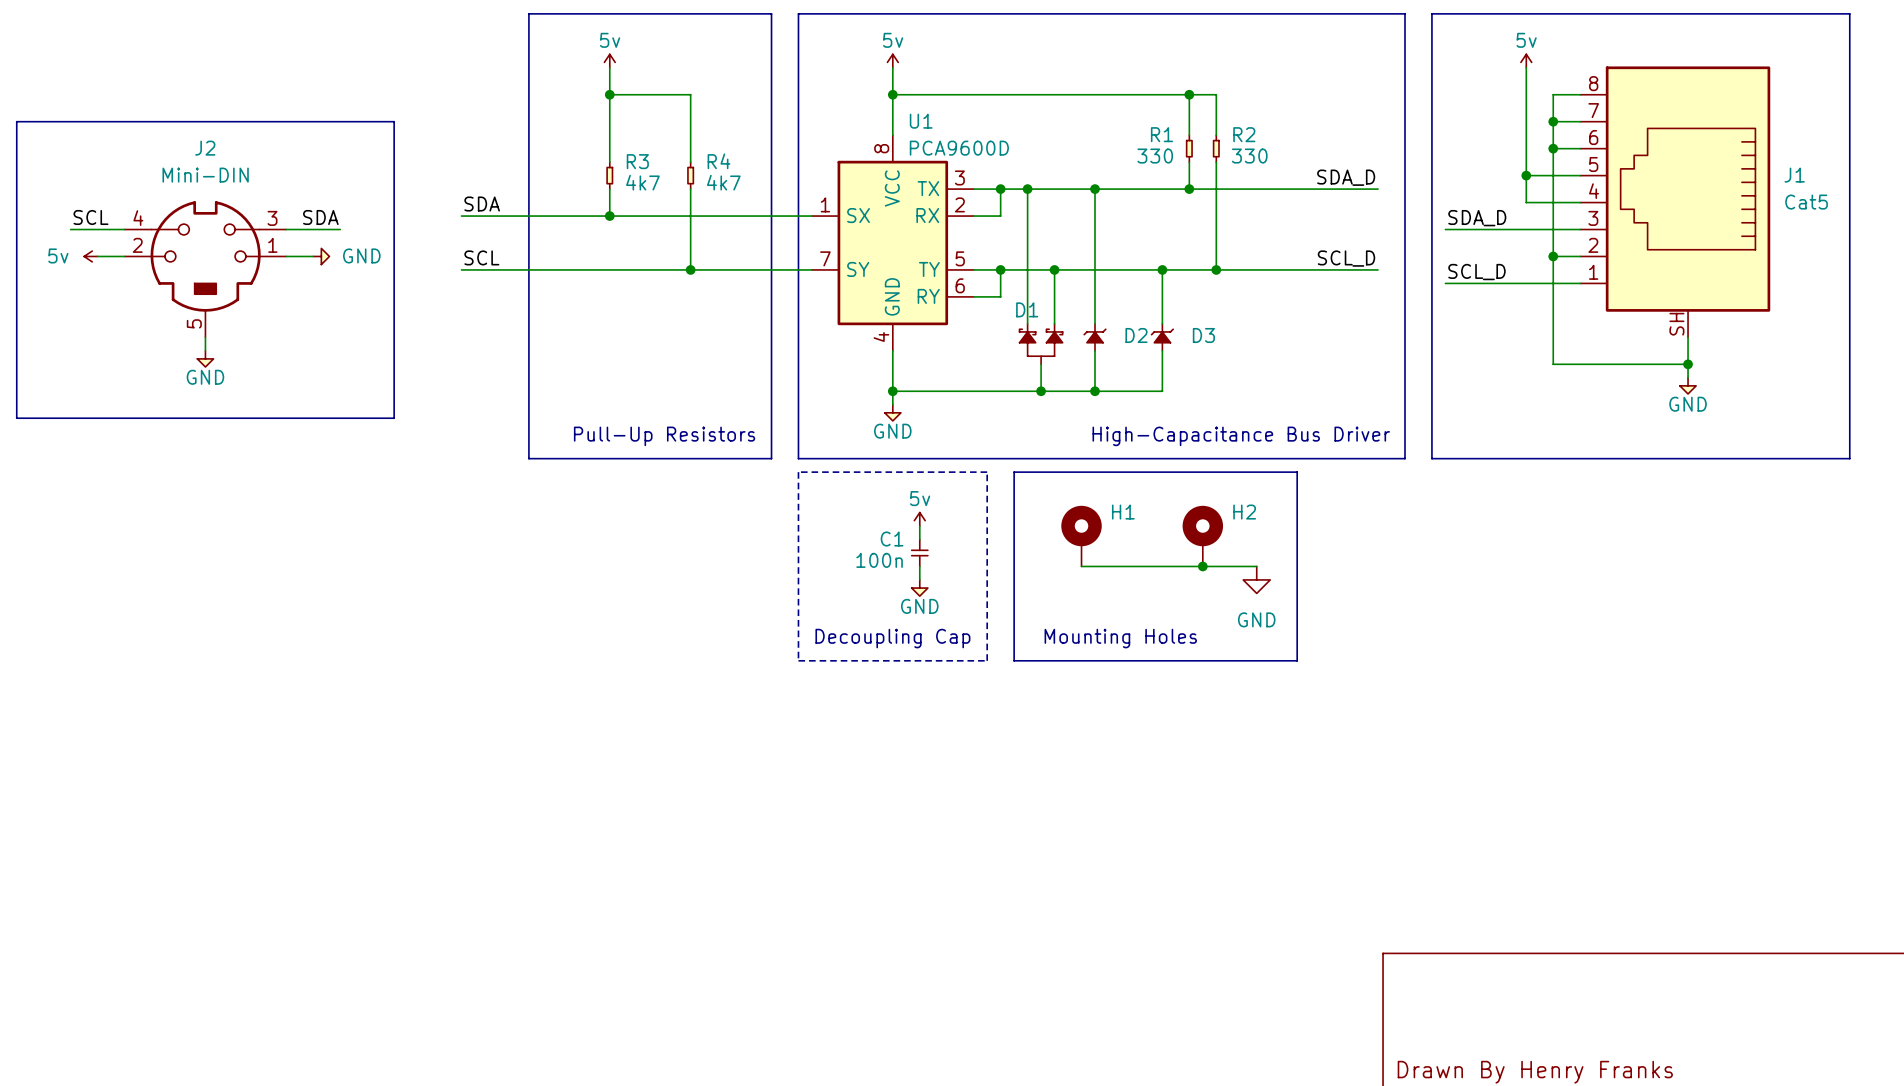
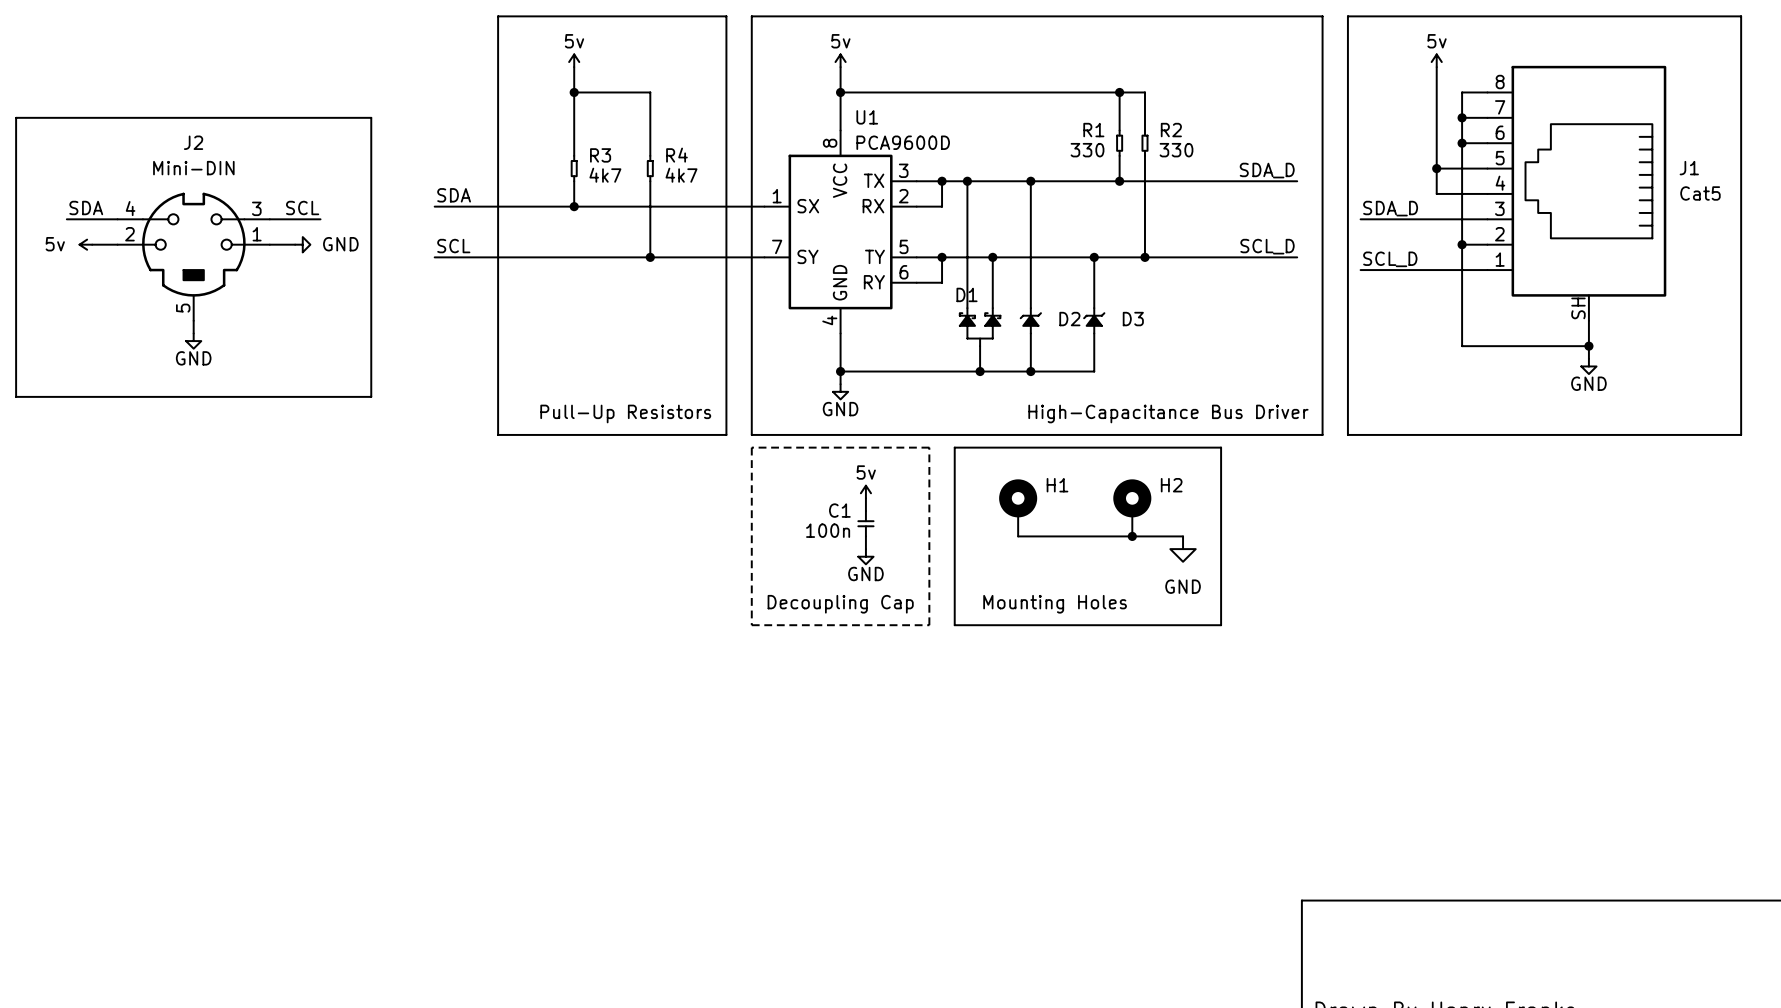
label: SCL (90, 217) -> SDA (86, 208)
label: SDA (320, 217) -> SCL (302, 208)

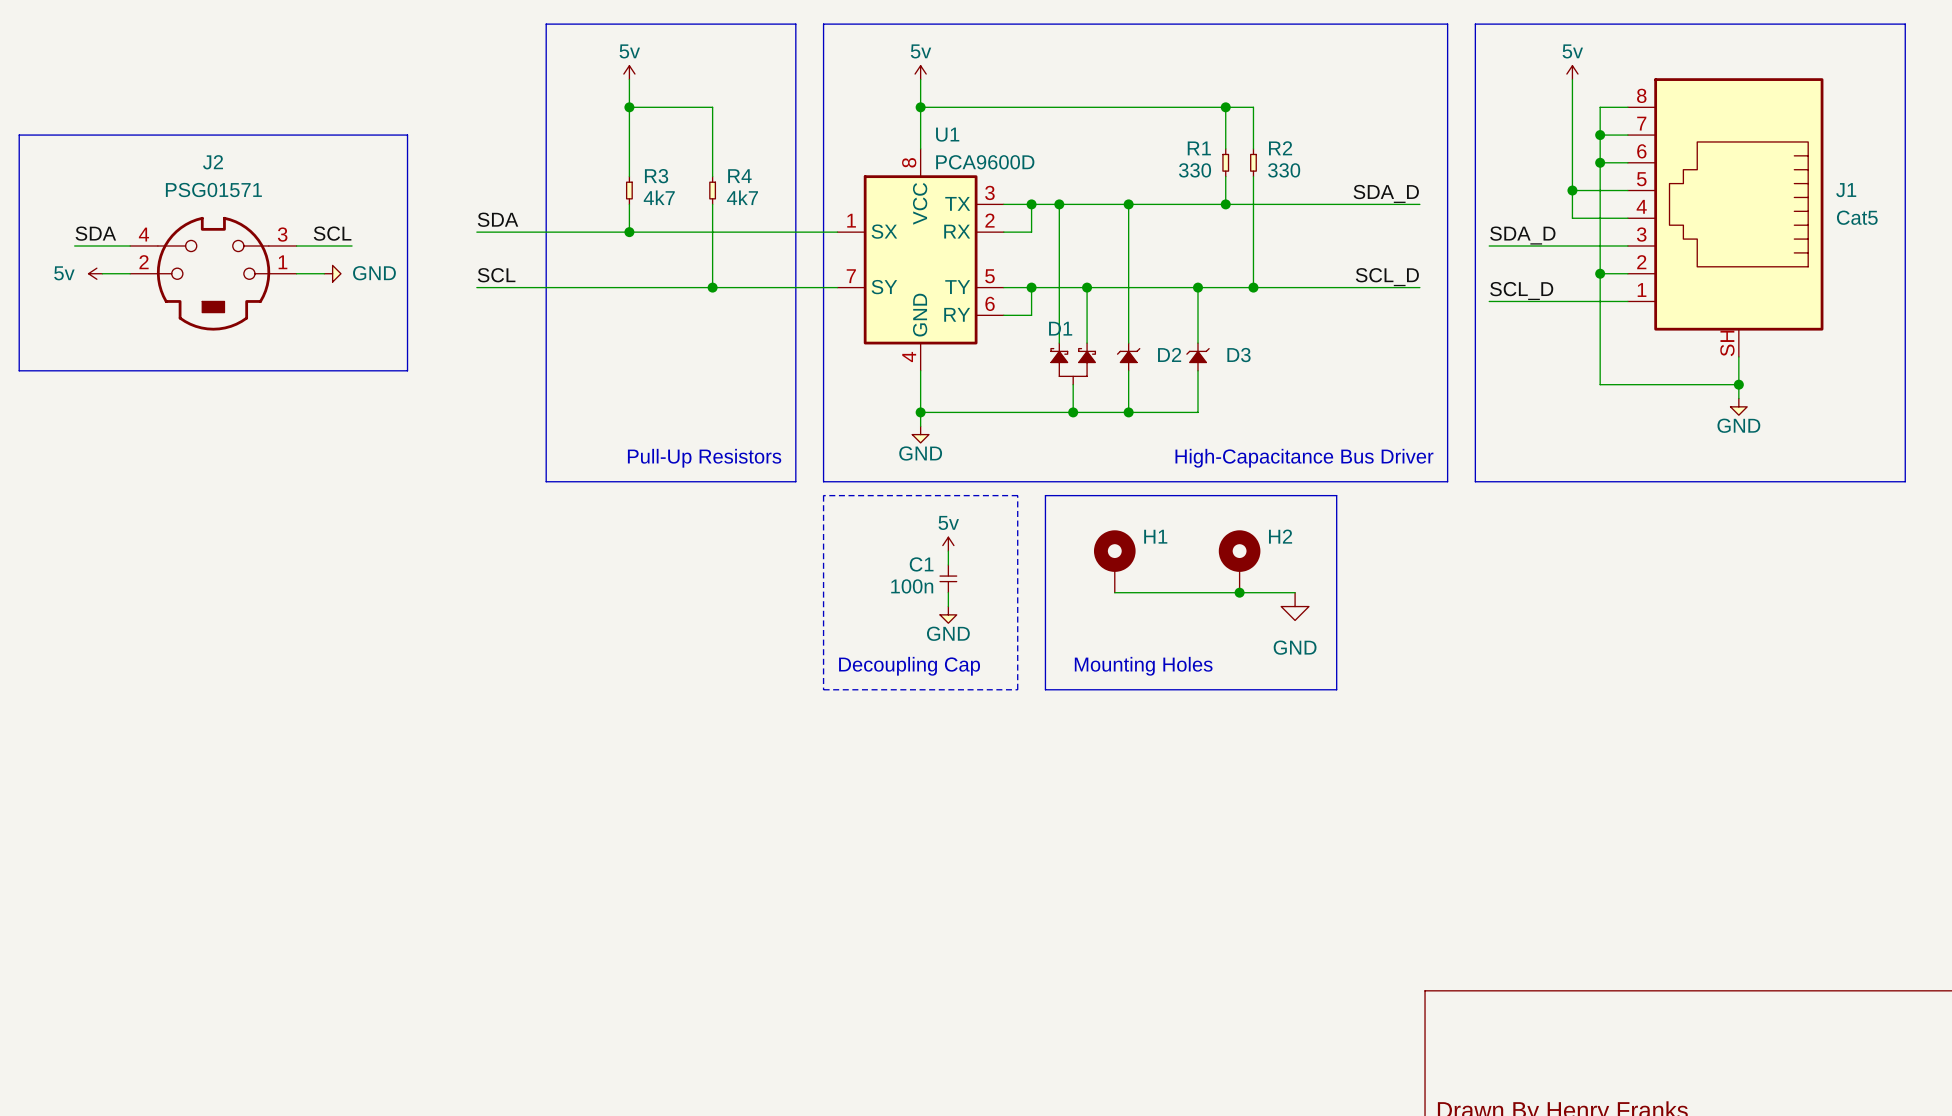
J2 value: Mini-DIN (193, 168) -> PSG01571 (213, 190)
J2 symbol: [117, 192, 270, 321] -> [130, 216, 297, 331]
wire: (193, 320) (193, 333) -> none
line: (16, 333) (16, 396) (371, 396) (371, 333) -> (19, 370) (407, 370)
power symbol: GND (193, 341) -> none

